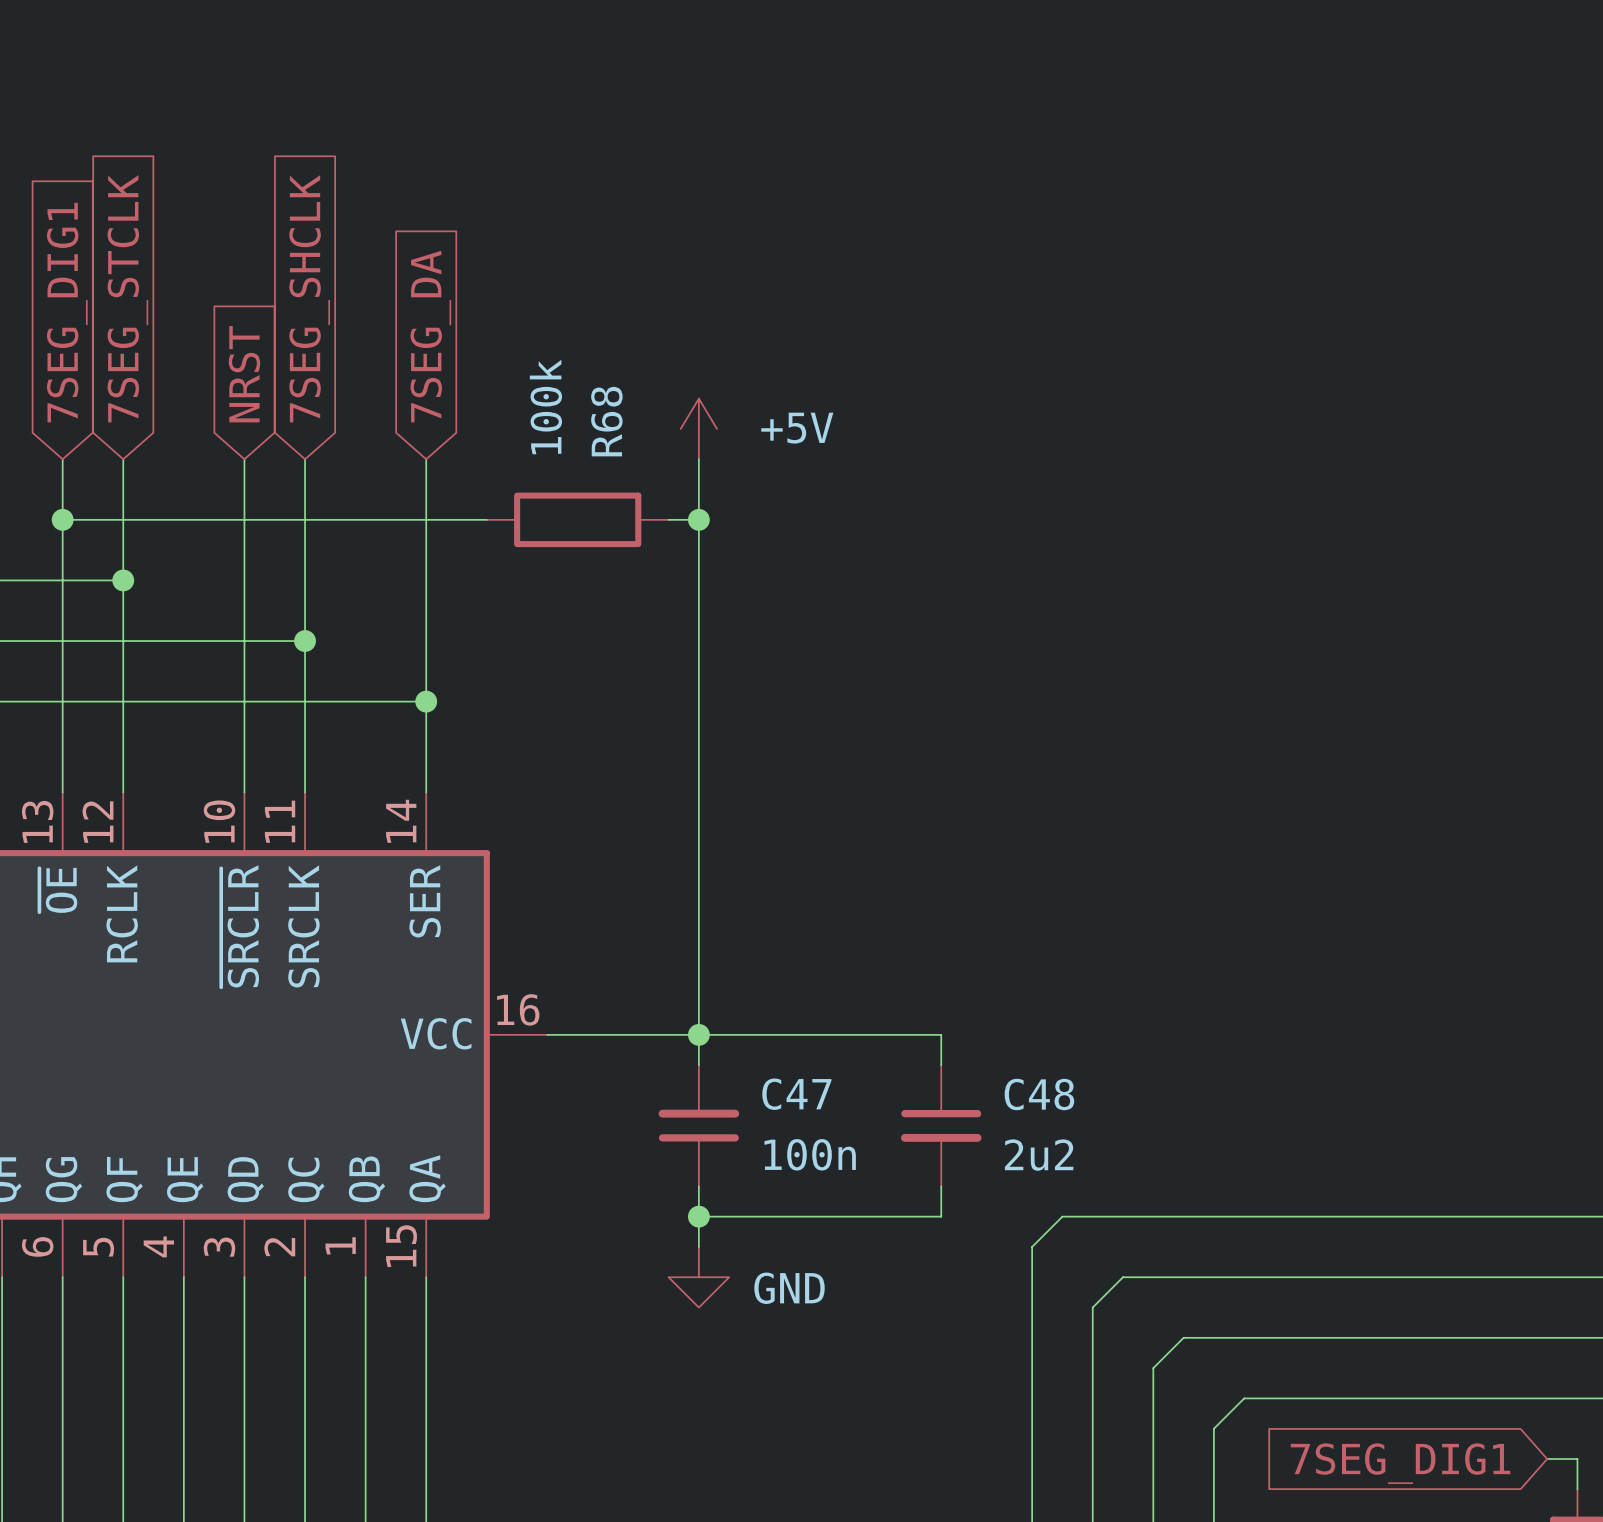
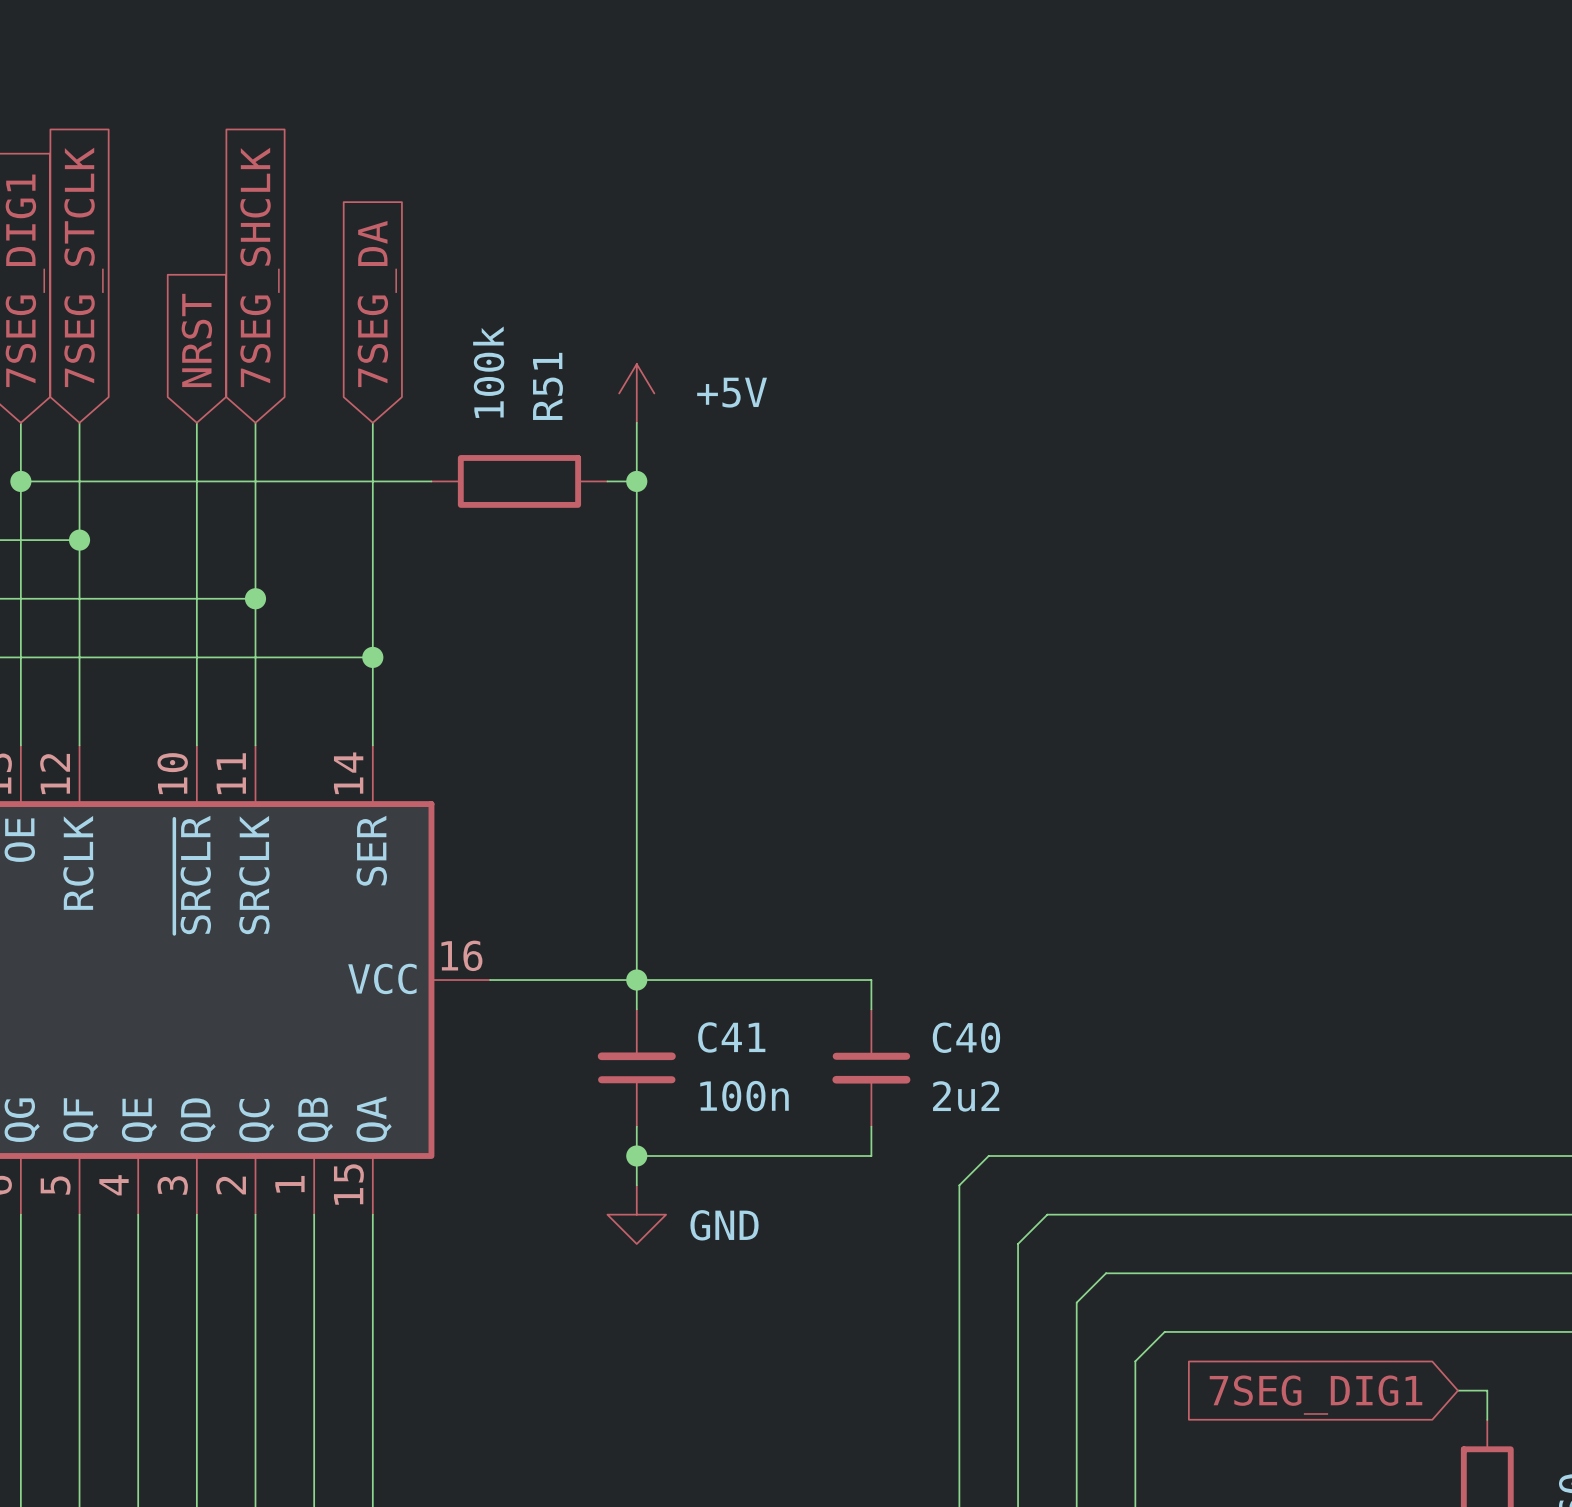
R68 name: R68 (606, 421) -> R51 (547, 386)
C47 name: C47 (796, 1094) -> C41 (731, 1037)
C48 name: C48 (1039, 1094) -> C40 (966, 1037)

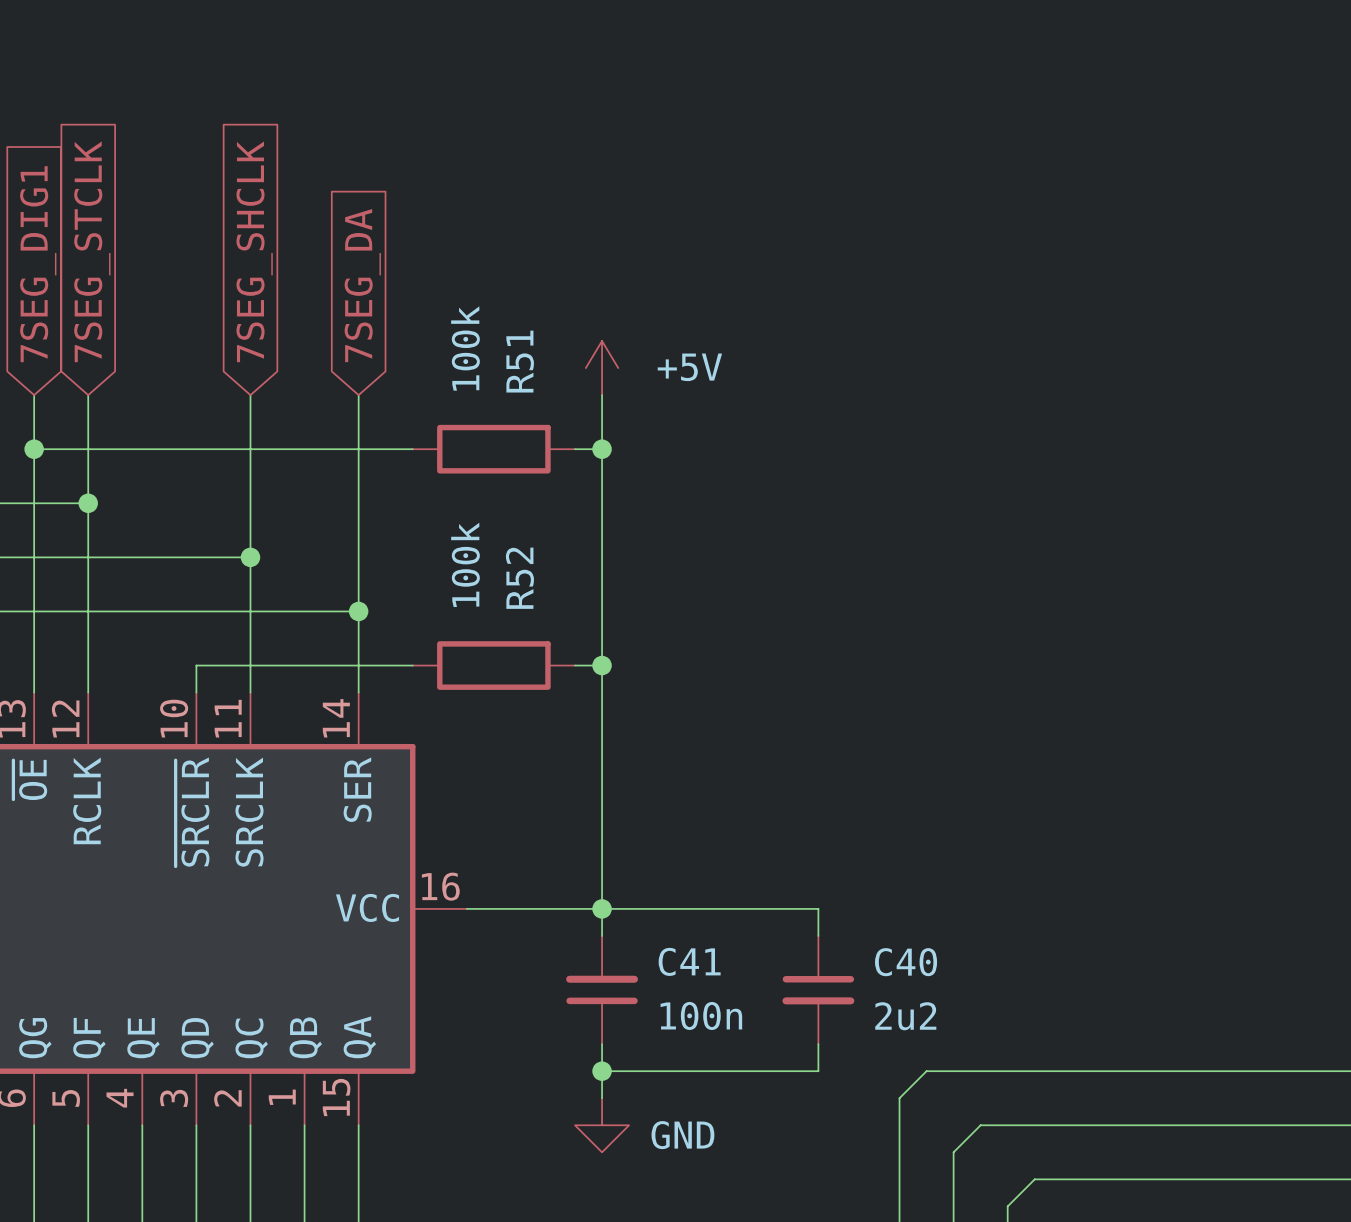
global label: NRST (196, 340) -> none
wire: (196, 422) (196, 716) -> (412, 665) (196, 665)
R52: none -> 100k (493, 665)
wire: none -> (575, 665) (602, 665)
junction: none -> (602, 665)

